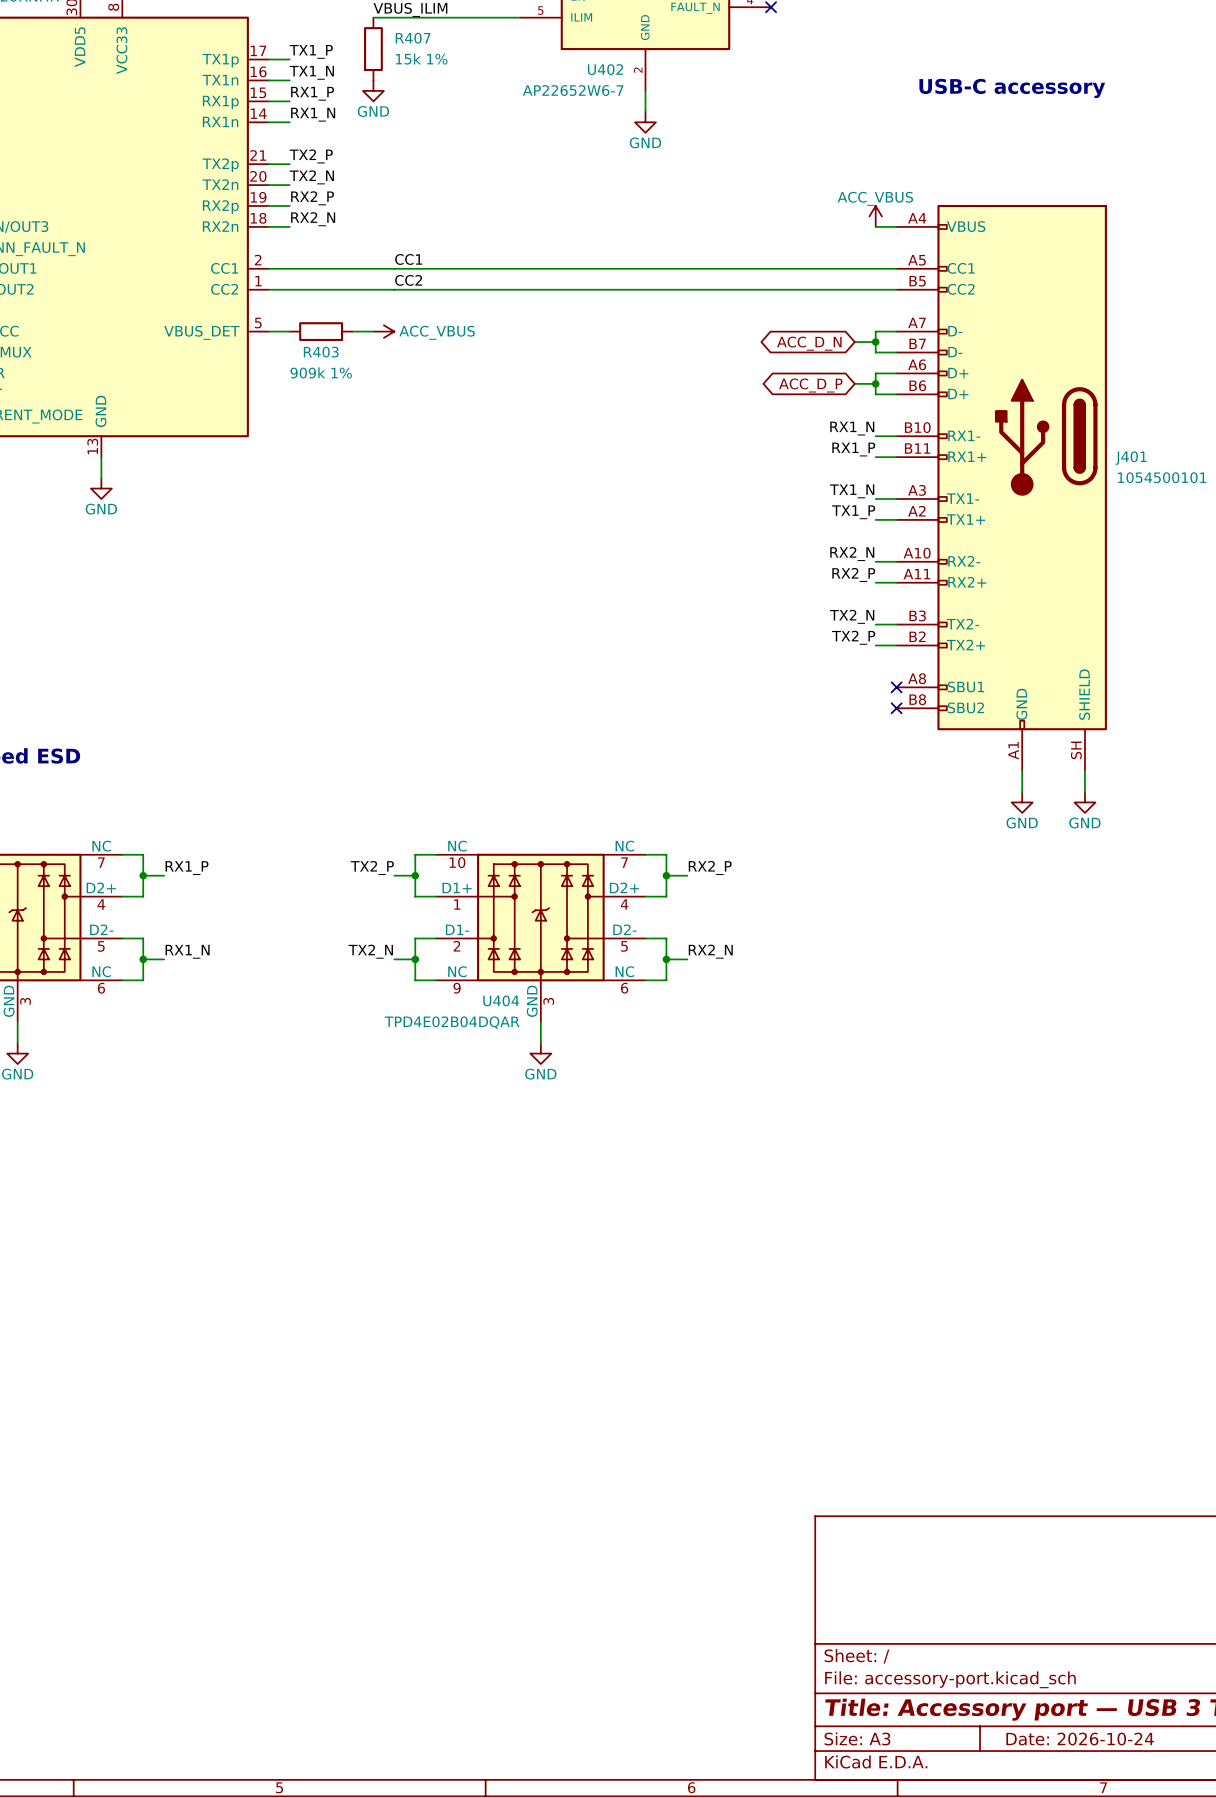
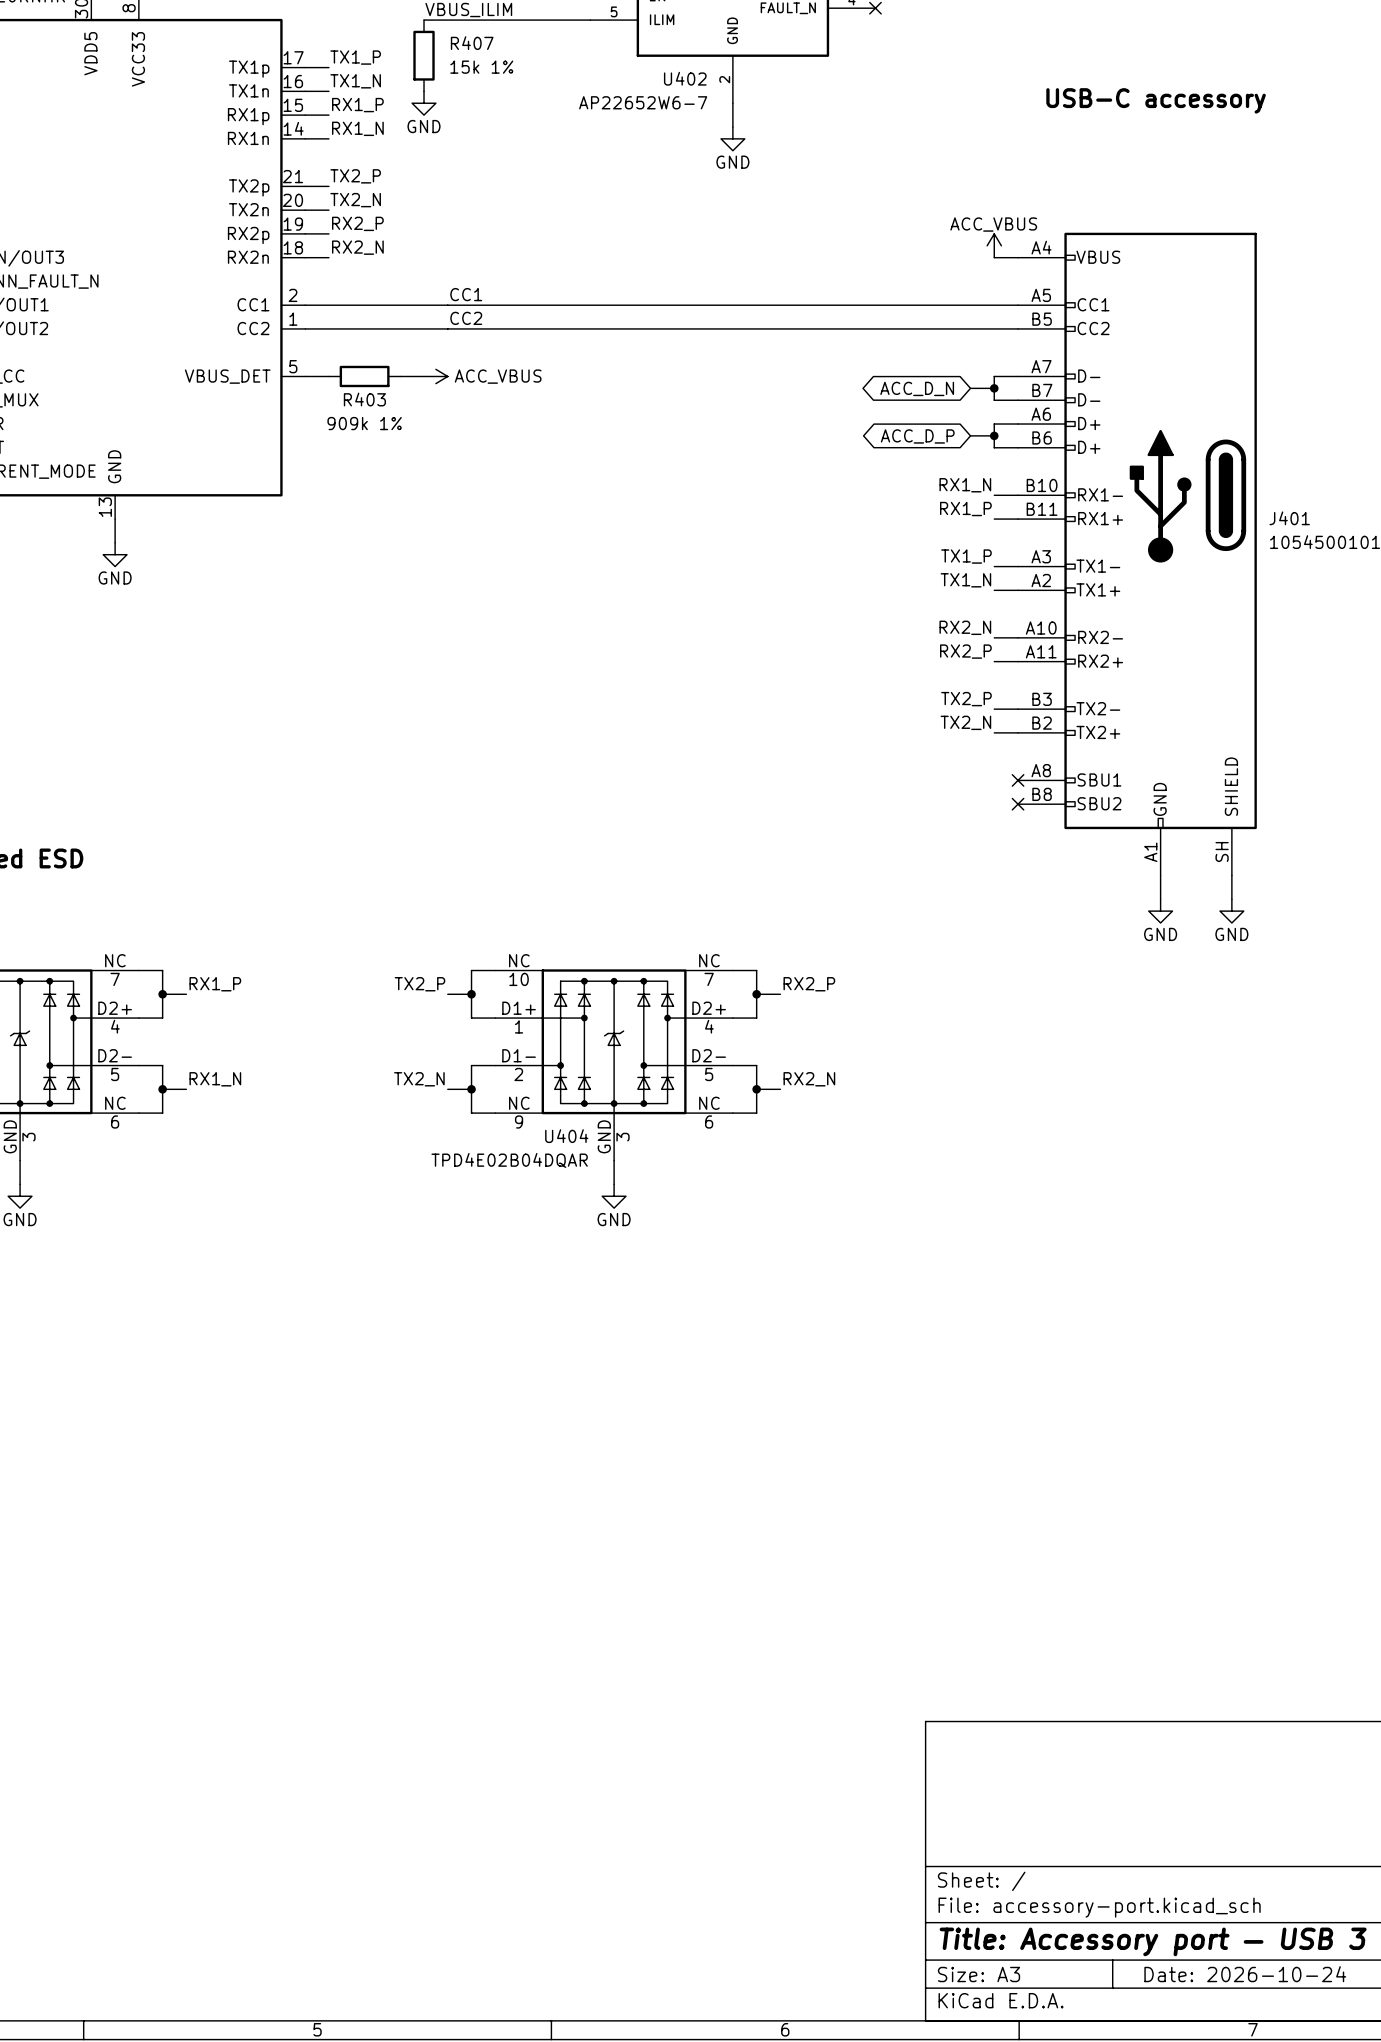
label: TX1_N (852, 491) -> TX1_P (966, 556)
label: TX1_P (853, 512) -> TX1_N (965, 580)
label: TX2_N (852, 616) -> TX2_P (966, 699)
label: TX2_P (853, 637) -> TX2_N (965, 722)

